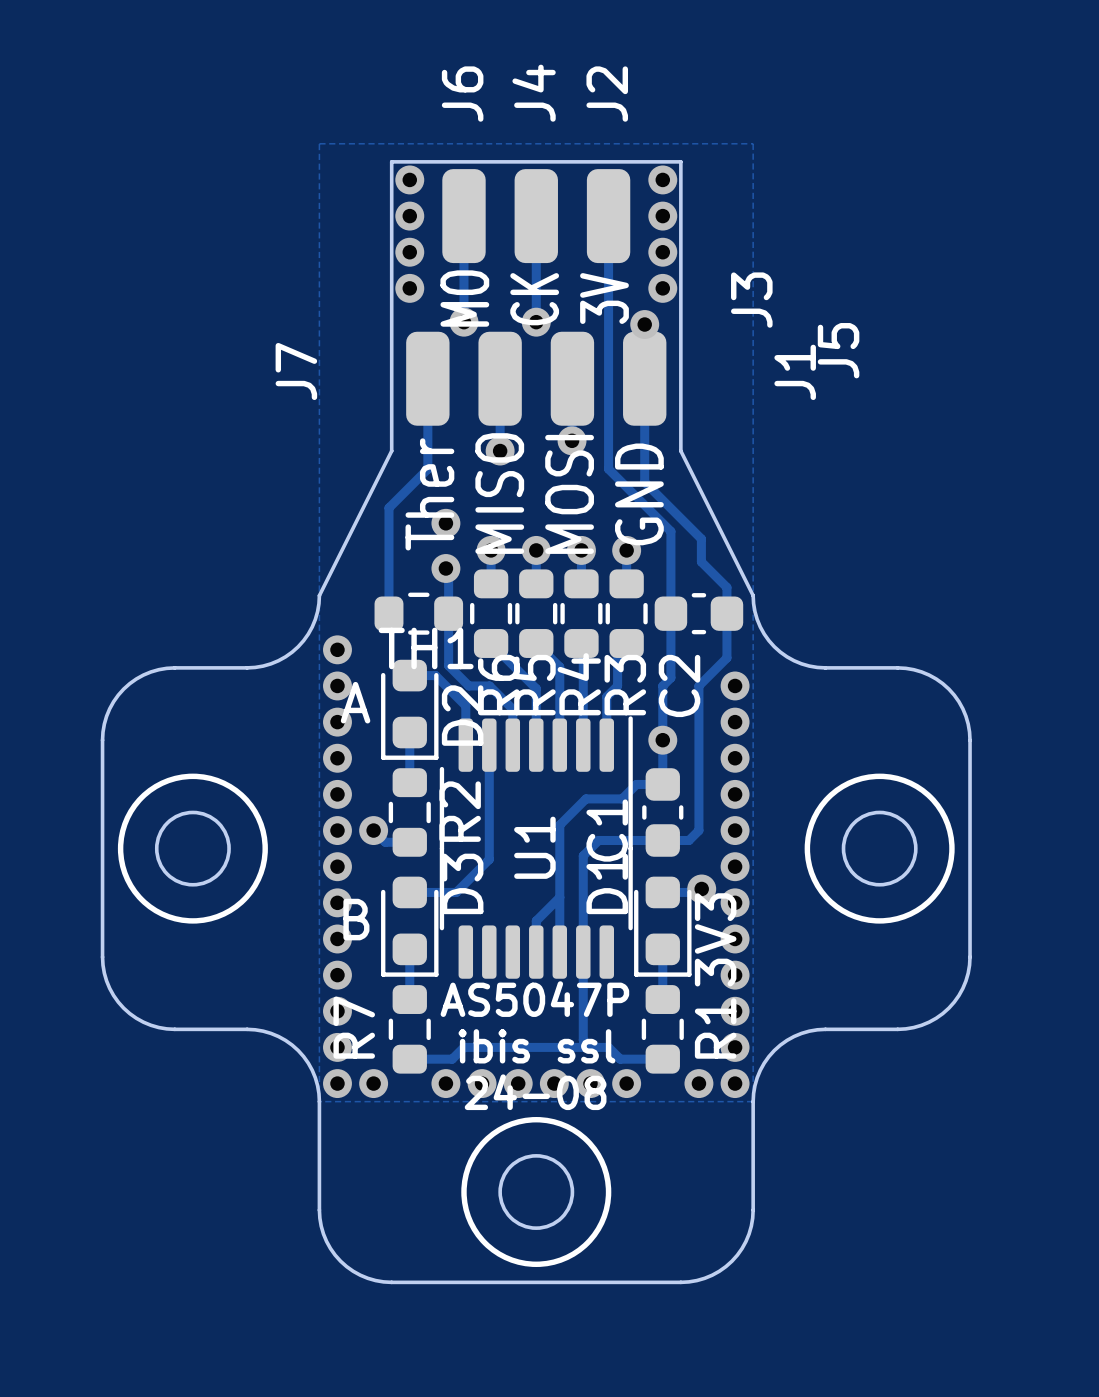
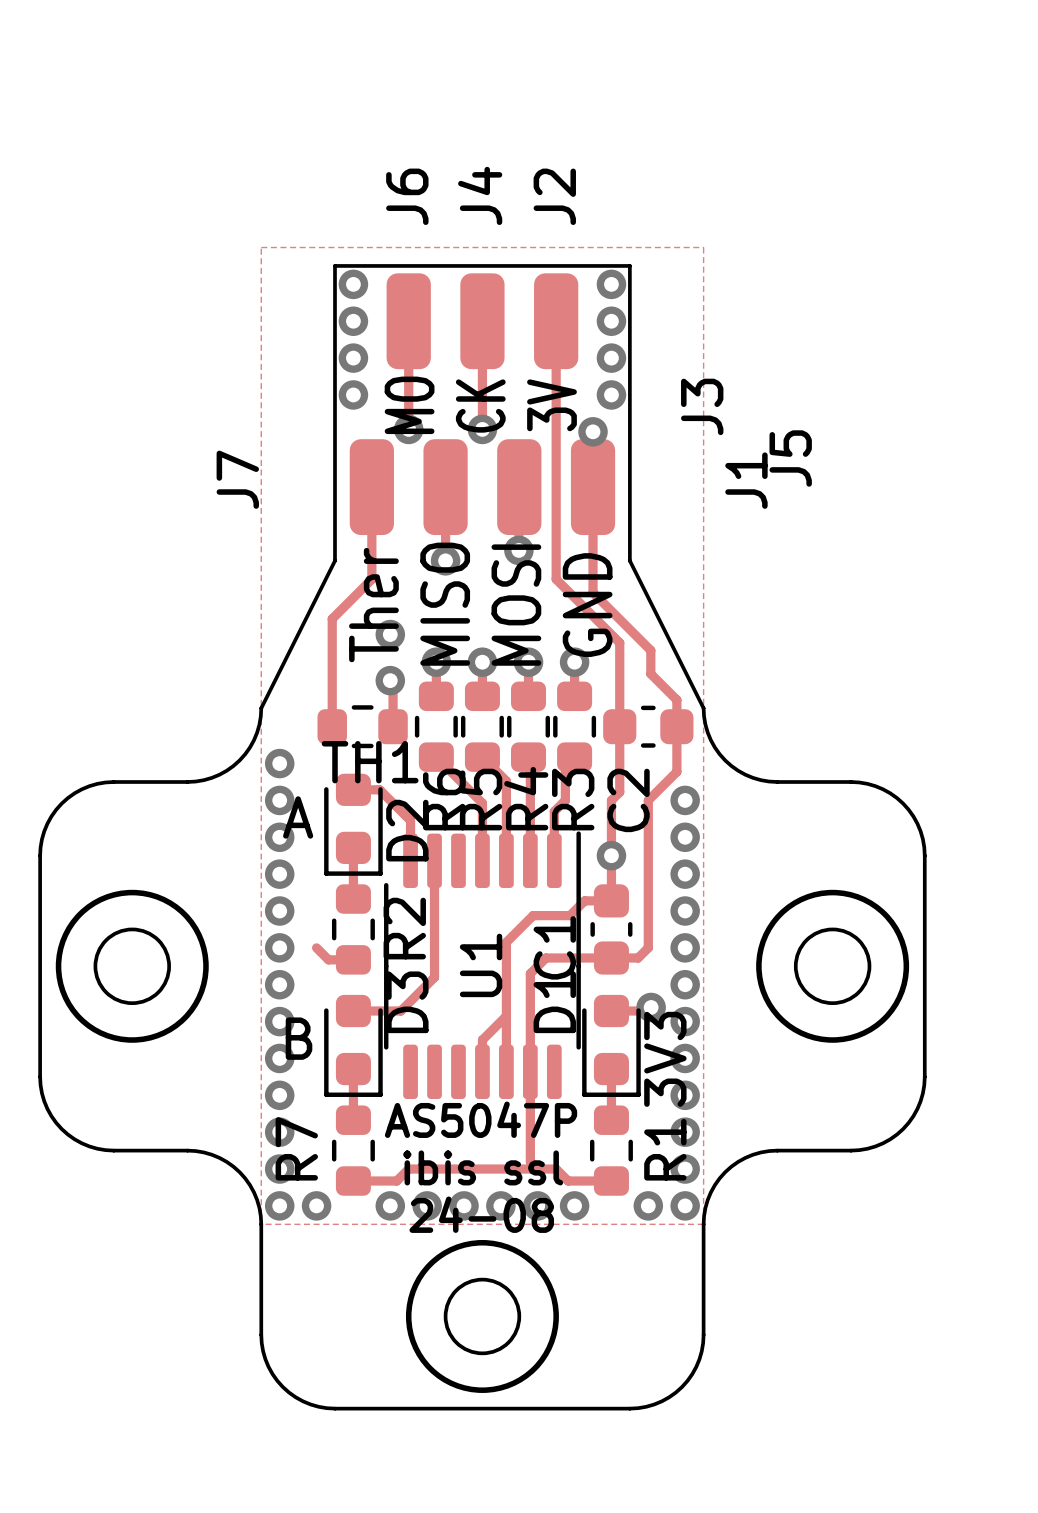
track: (448, 613) (448, 665) (468, 685) (489, 685) (512, 709) (512, 745) -> none
via: (373, 830) -> none

